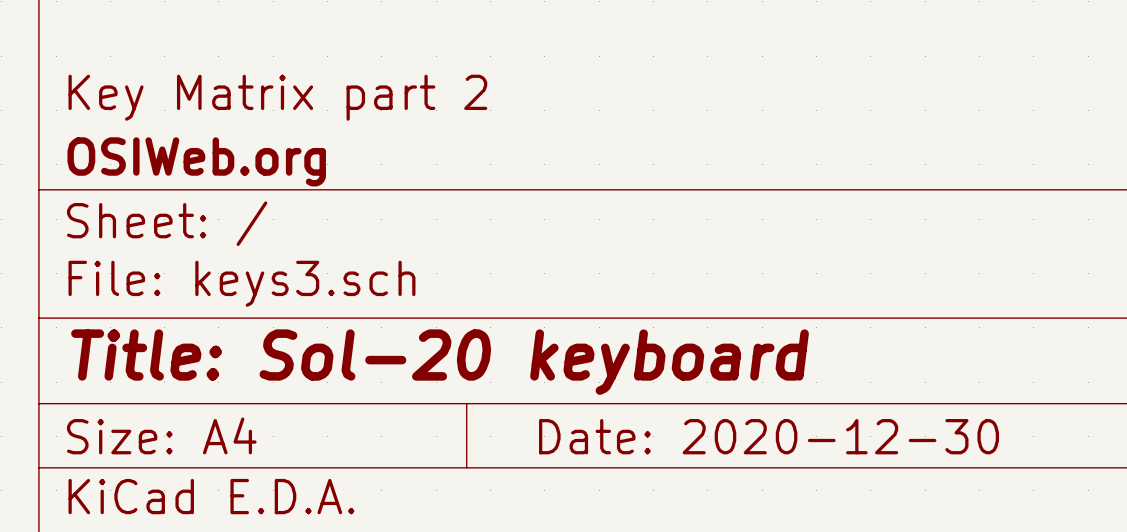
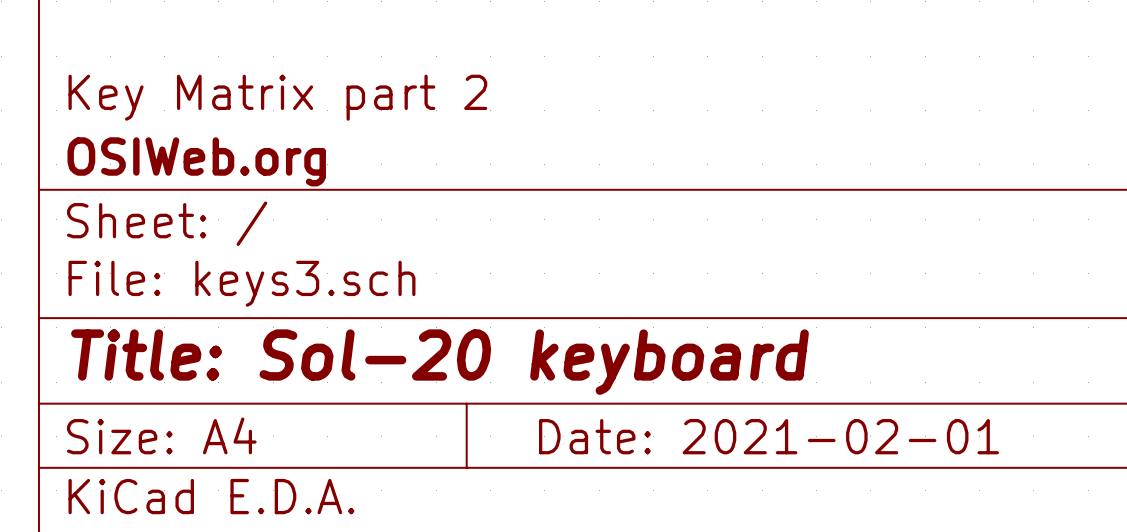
title block: Date: 2020-12-30 (769, 436) -> Date: 2021-02-01 (769, 436)

